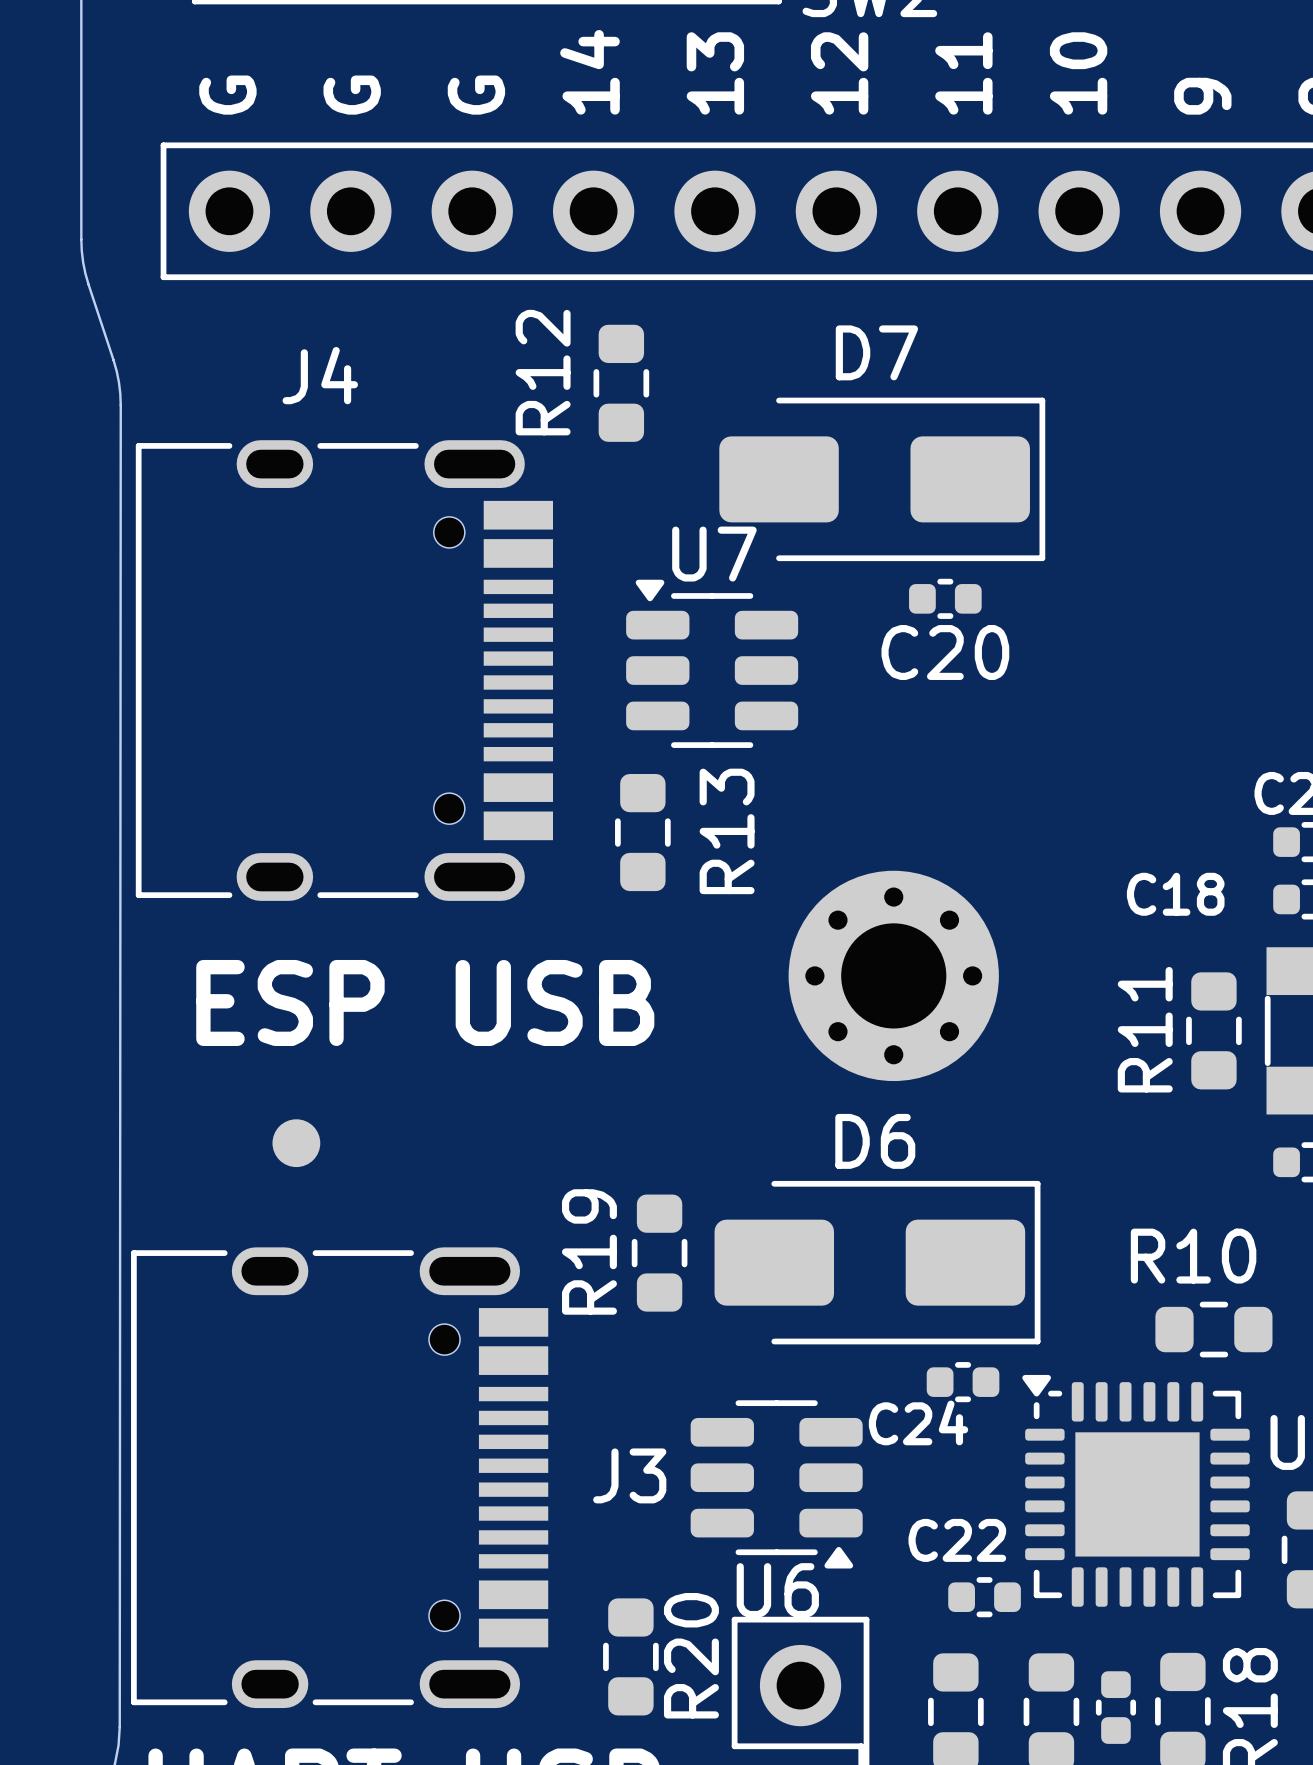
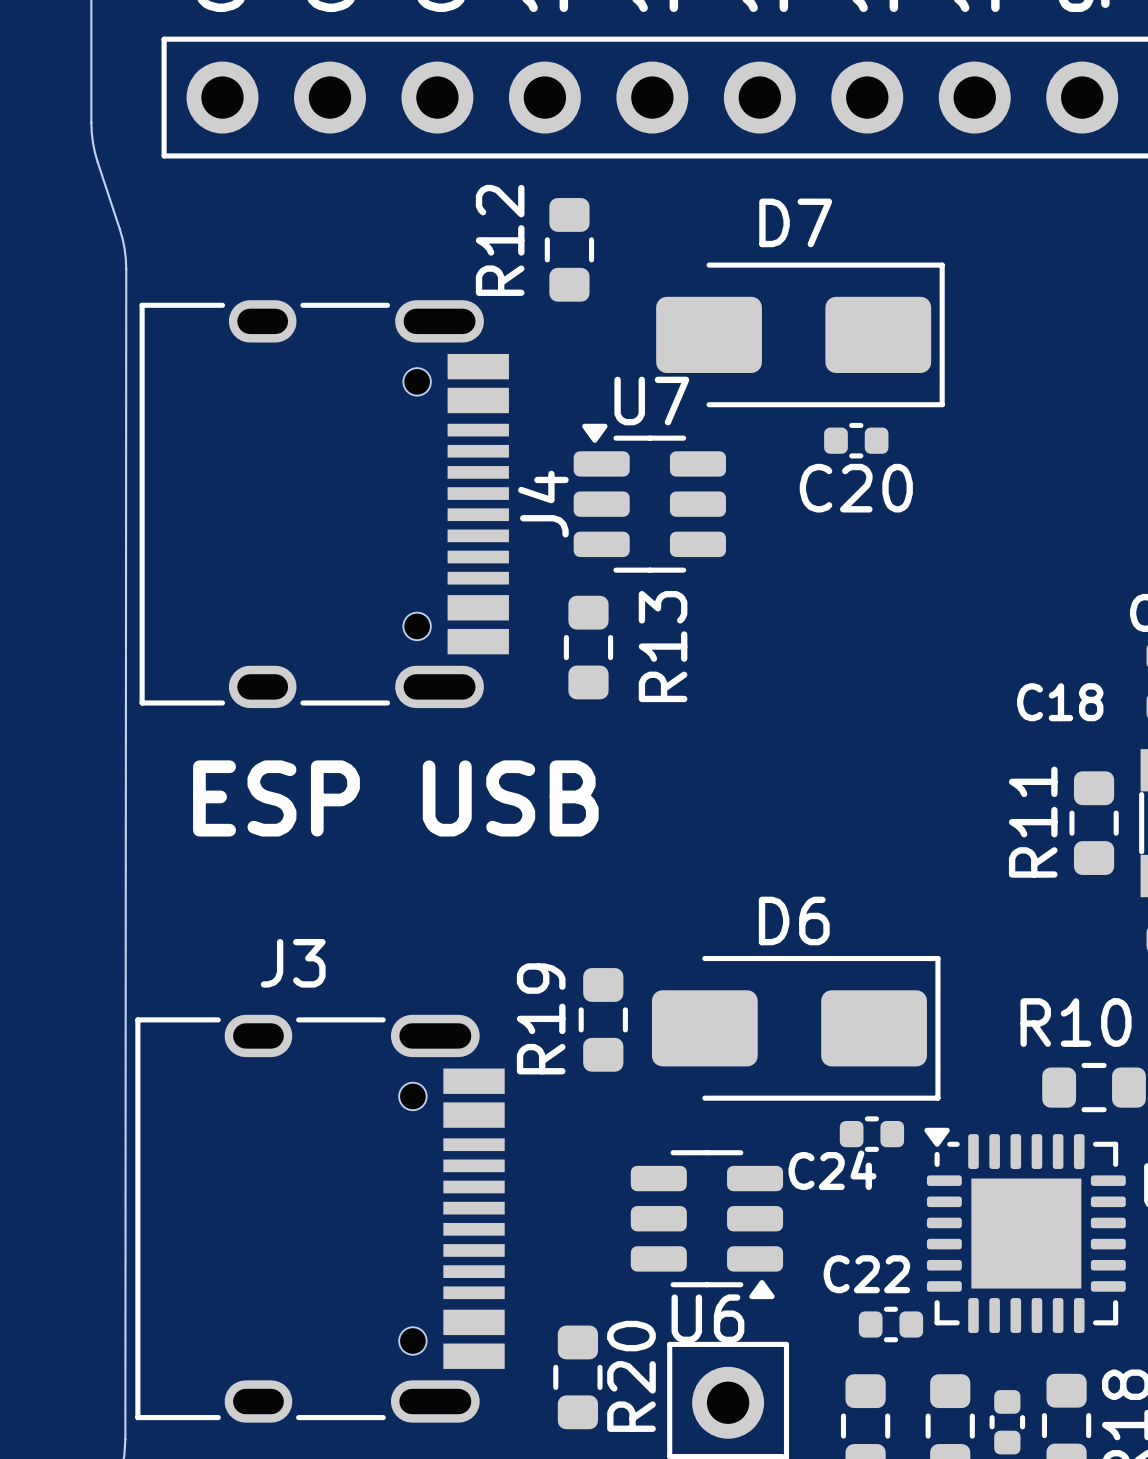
J4 name rotation: 0° (320, 375) -> 90° counterclockwise (543, 504)
J4 name position: J4 (320, 375) -> J4 (543, 504)
part: (893, 975) -> none
part: (296, 1143) -> none
J3 name position: J3 (629, 1475) -> J3 (293, 963)

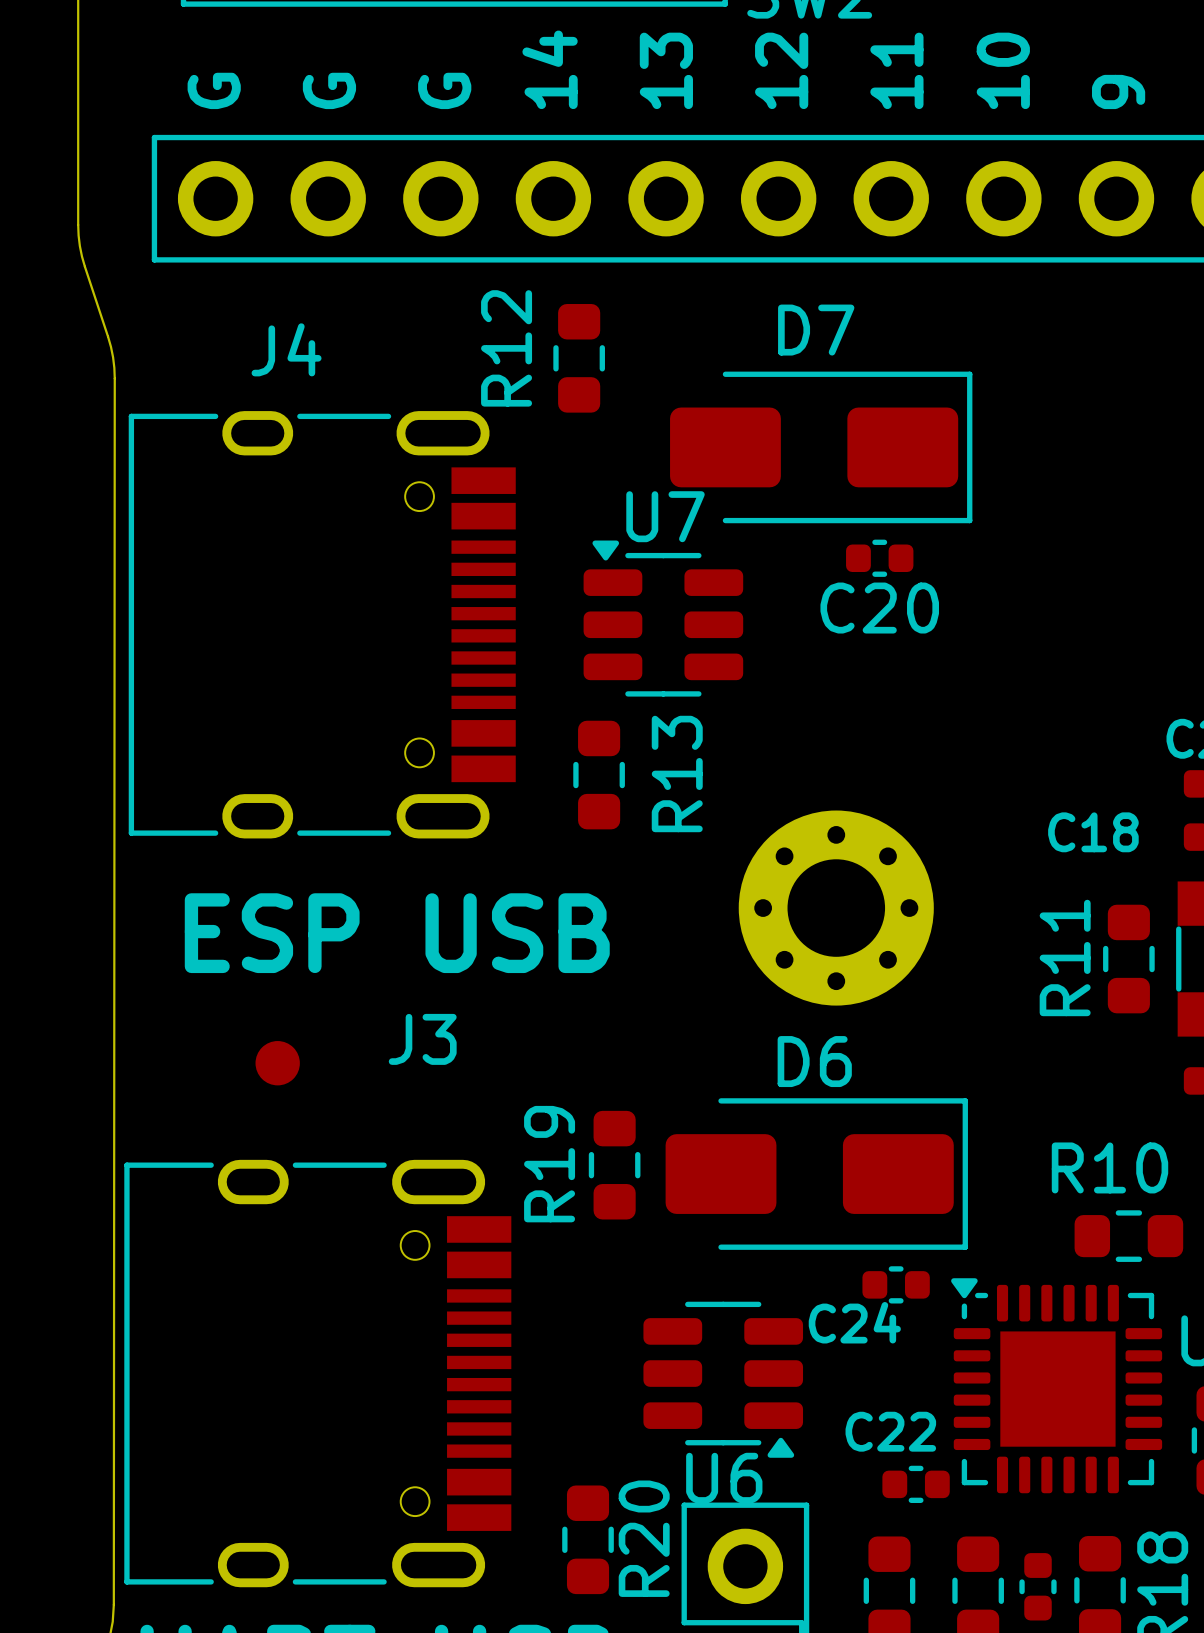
J4 name rotation: 0° (543, 504) -> 90° clockwise (286, 349)
J4 name position: J4 (543, 504) -> J4 (286, 349)
part: none -> (836, 908)
part: none -> (277, 1063)
J3 name position: J3 (293, 963) -> J3 (422, 1039)

